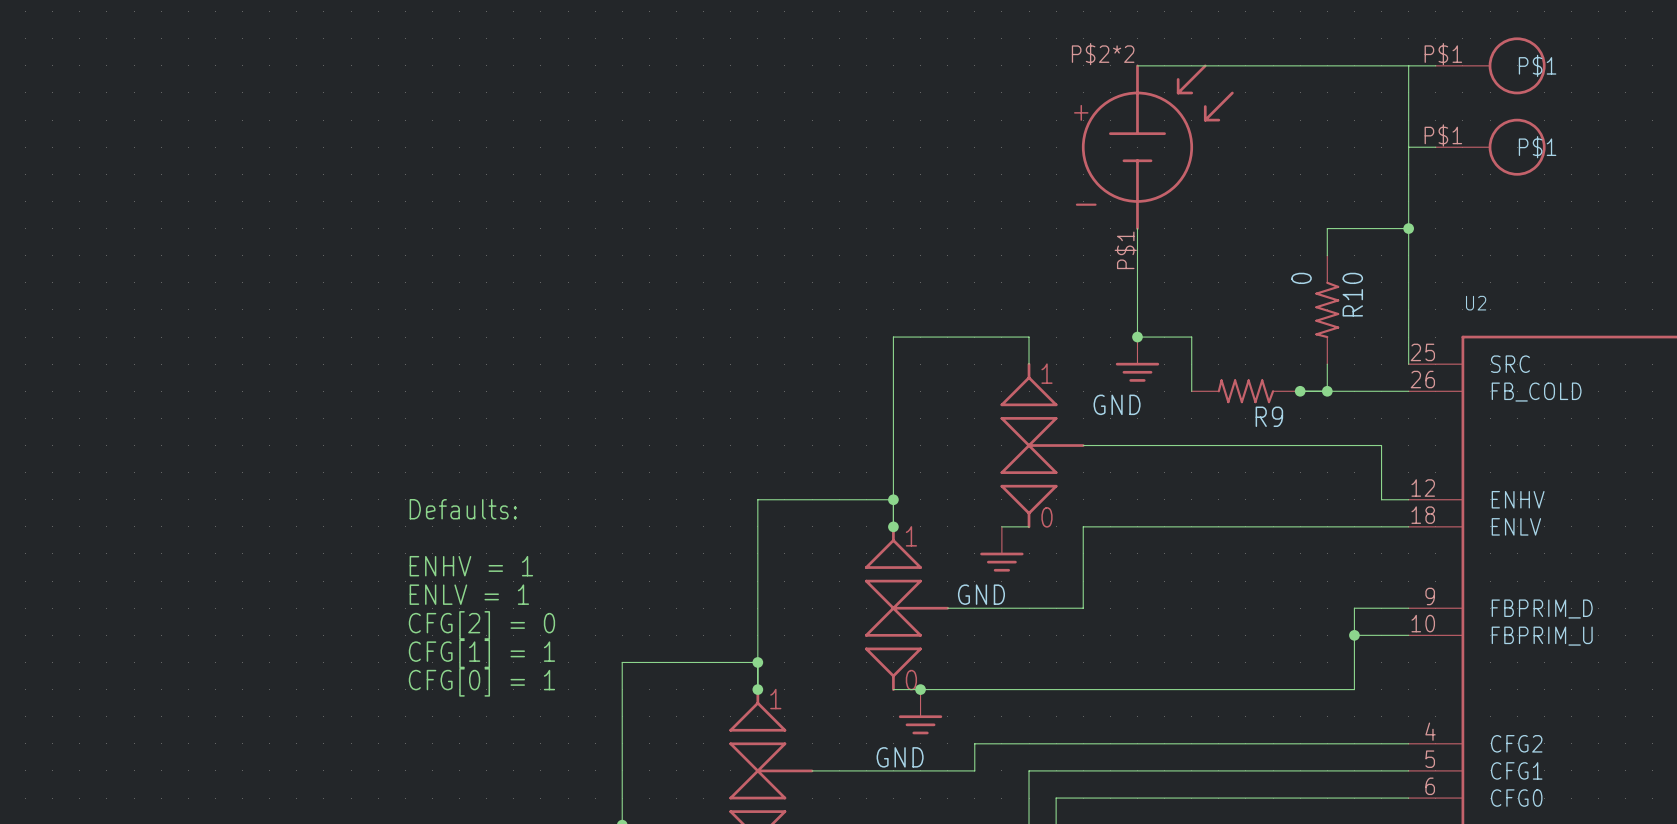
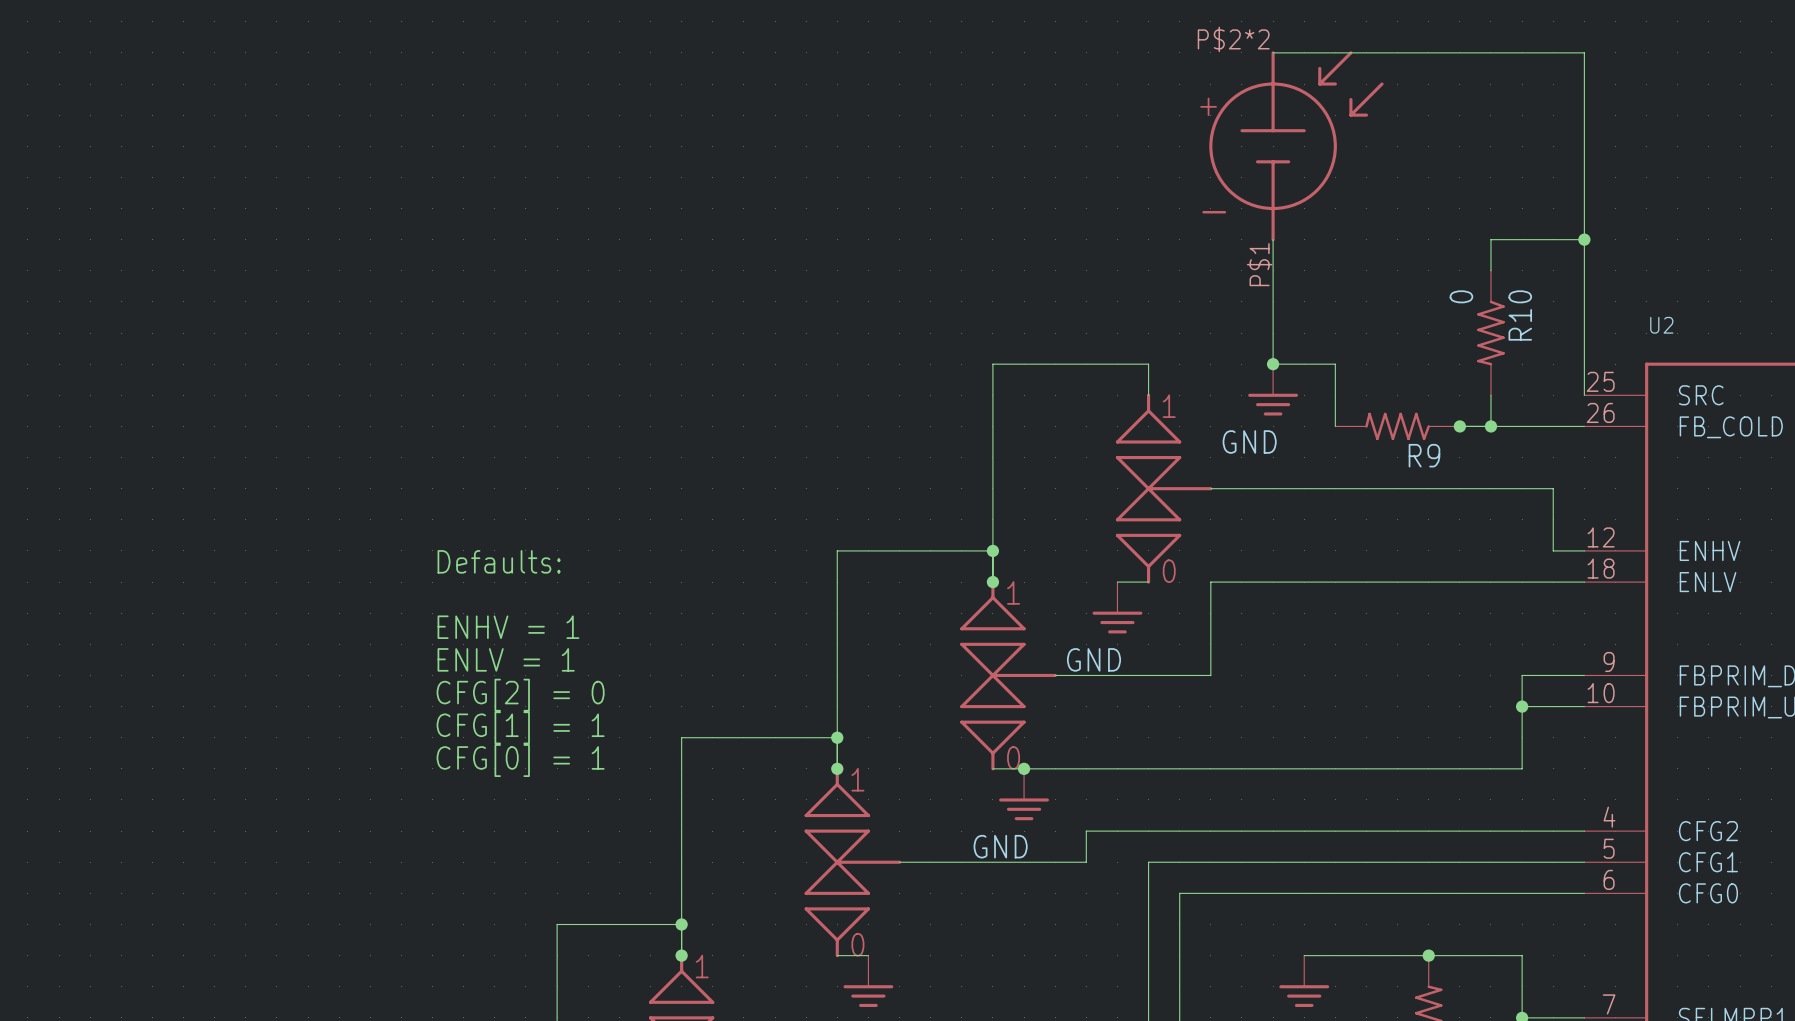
wire: (1408, 65) (1435, 65) -> none
part: (1490, 65) -> none
wire: (1408, 147) (1435, 147) -> none
part: (1490, 147) -> none

